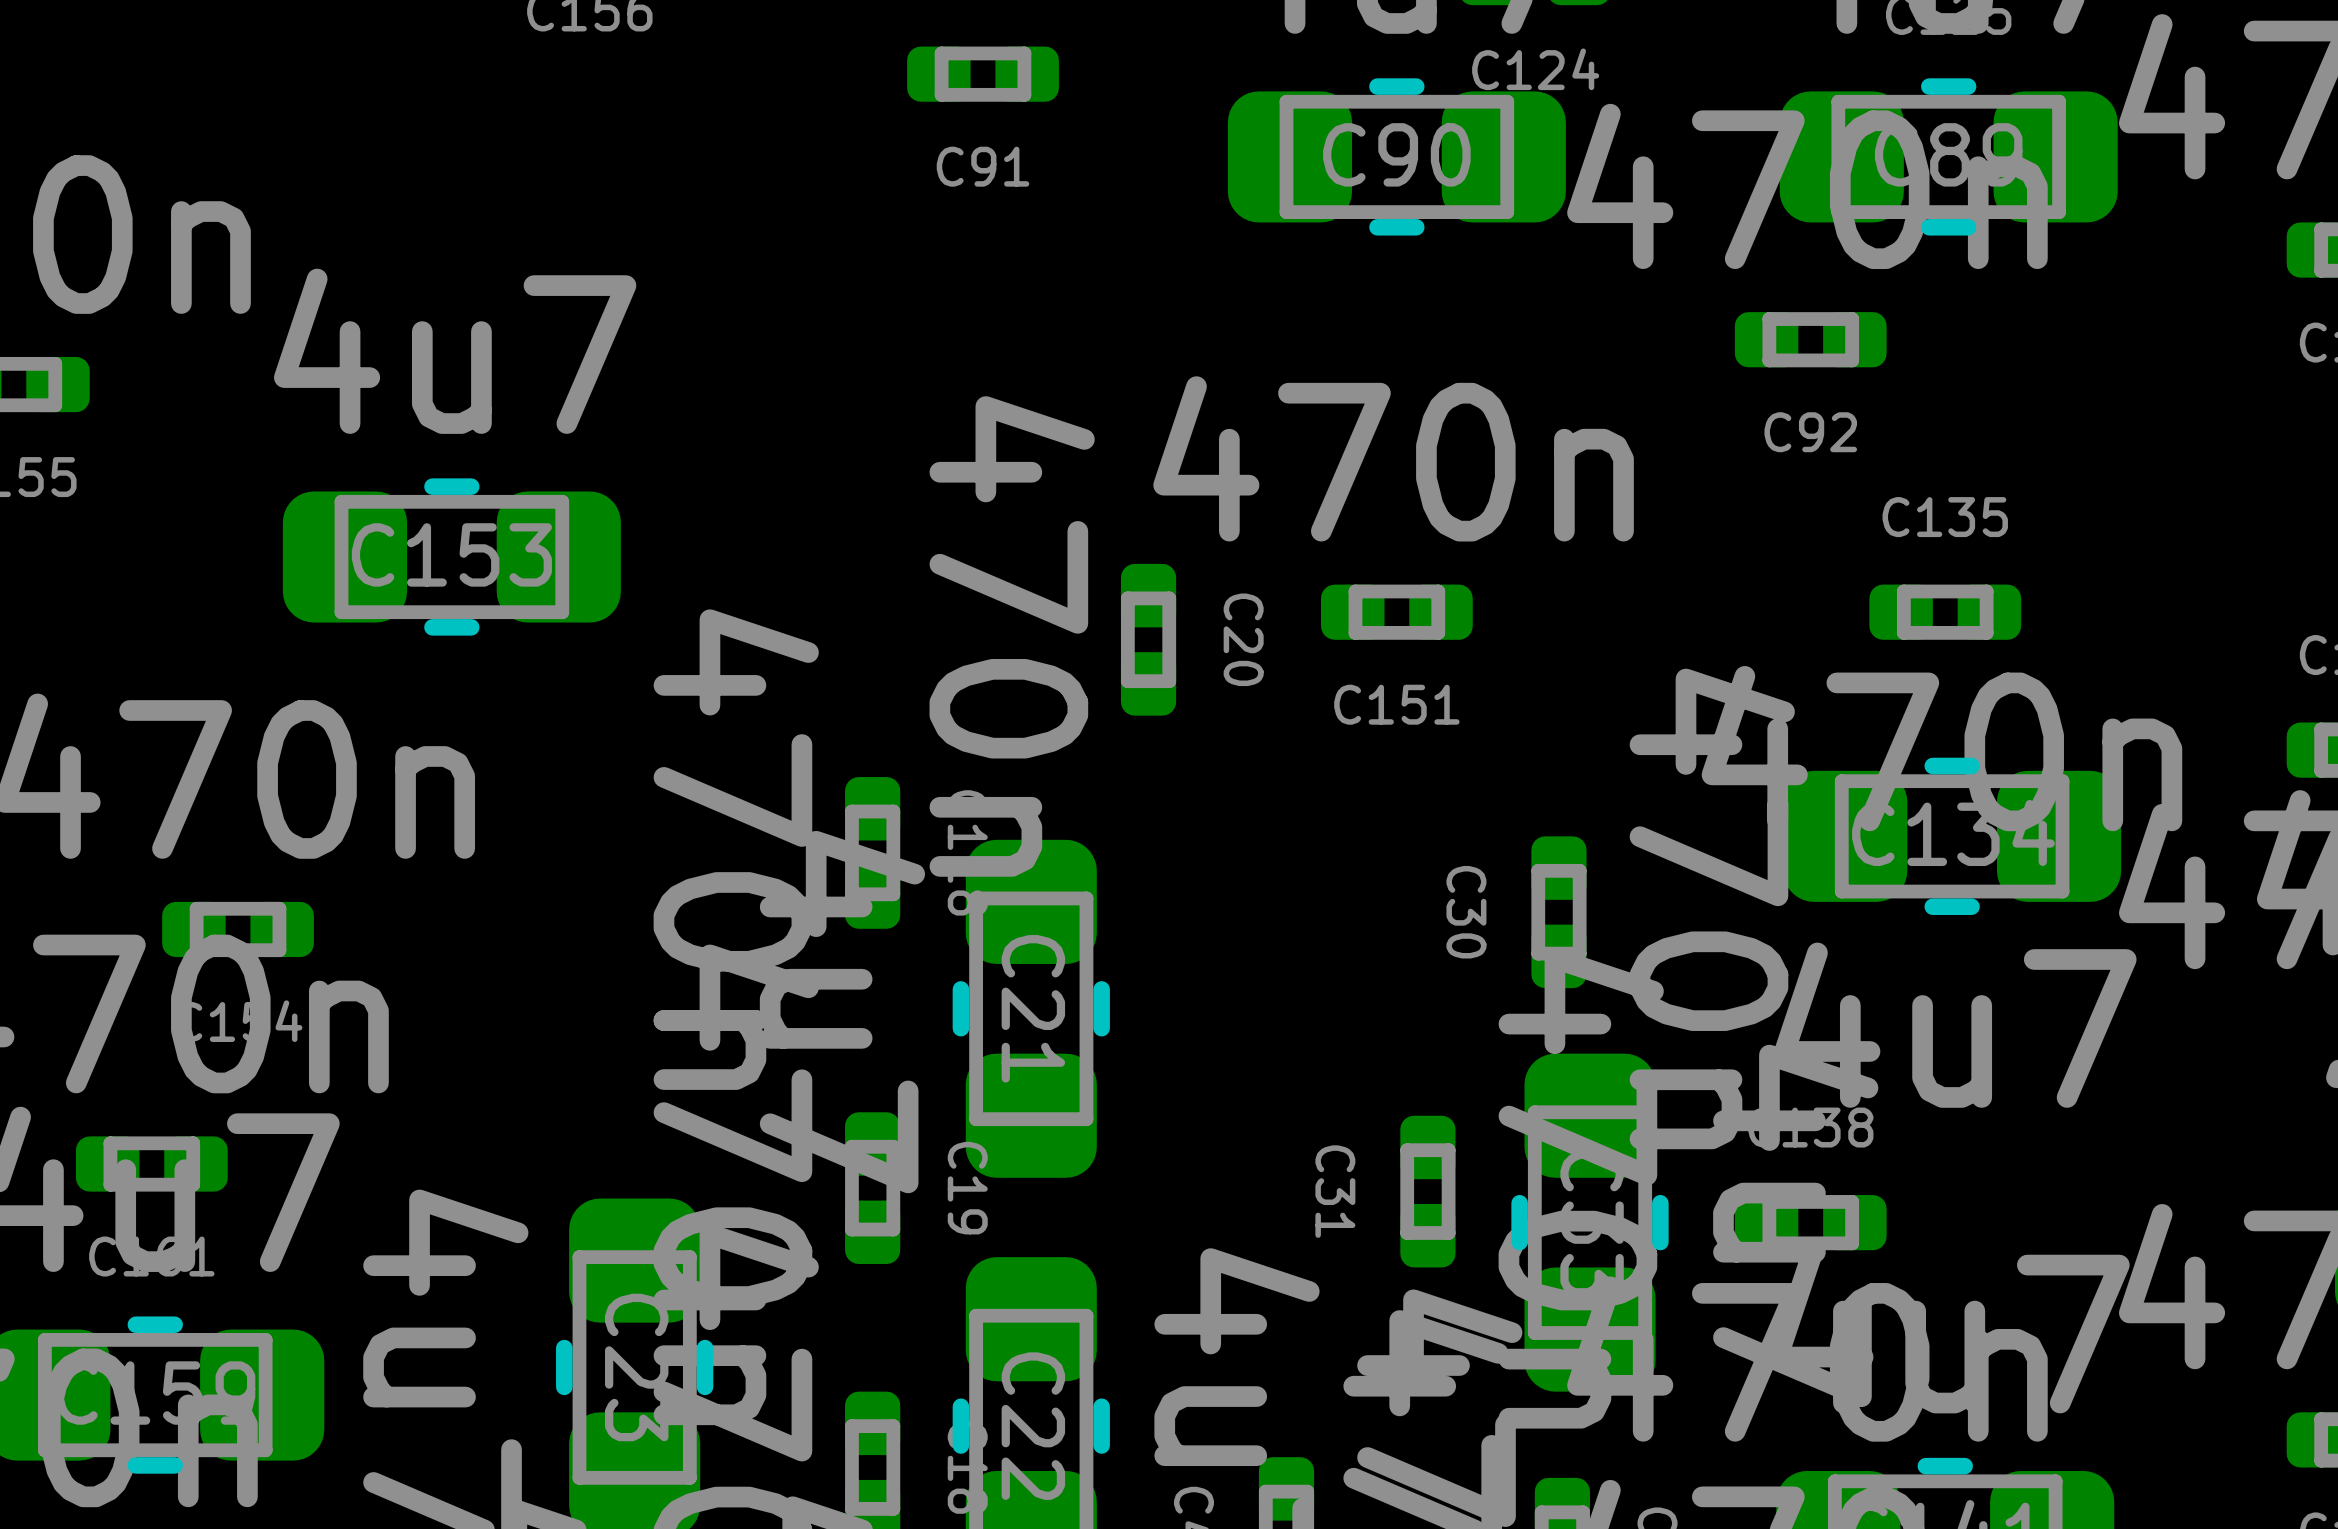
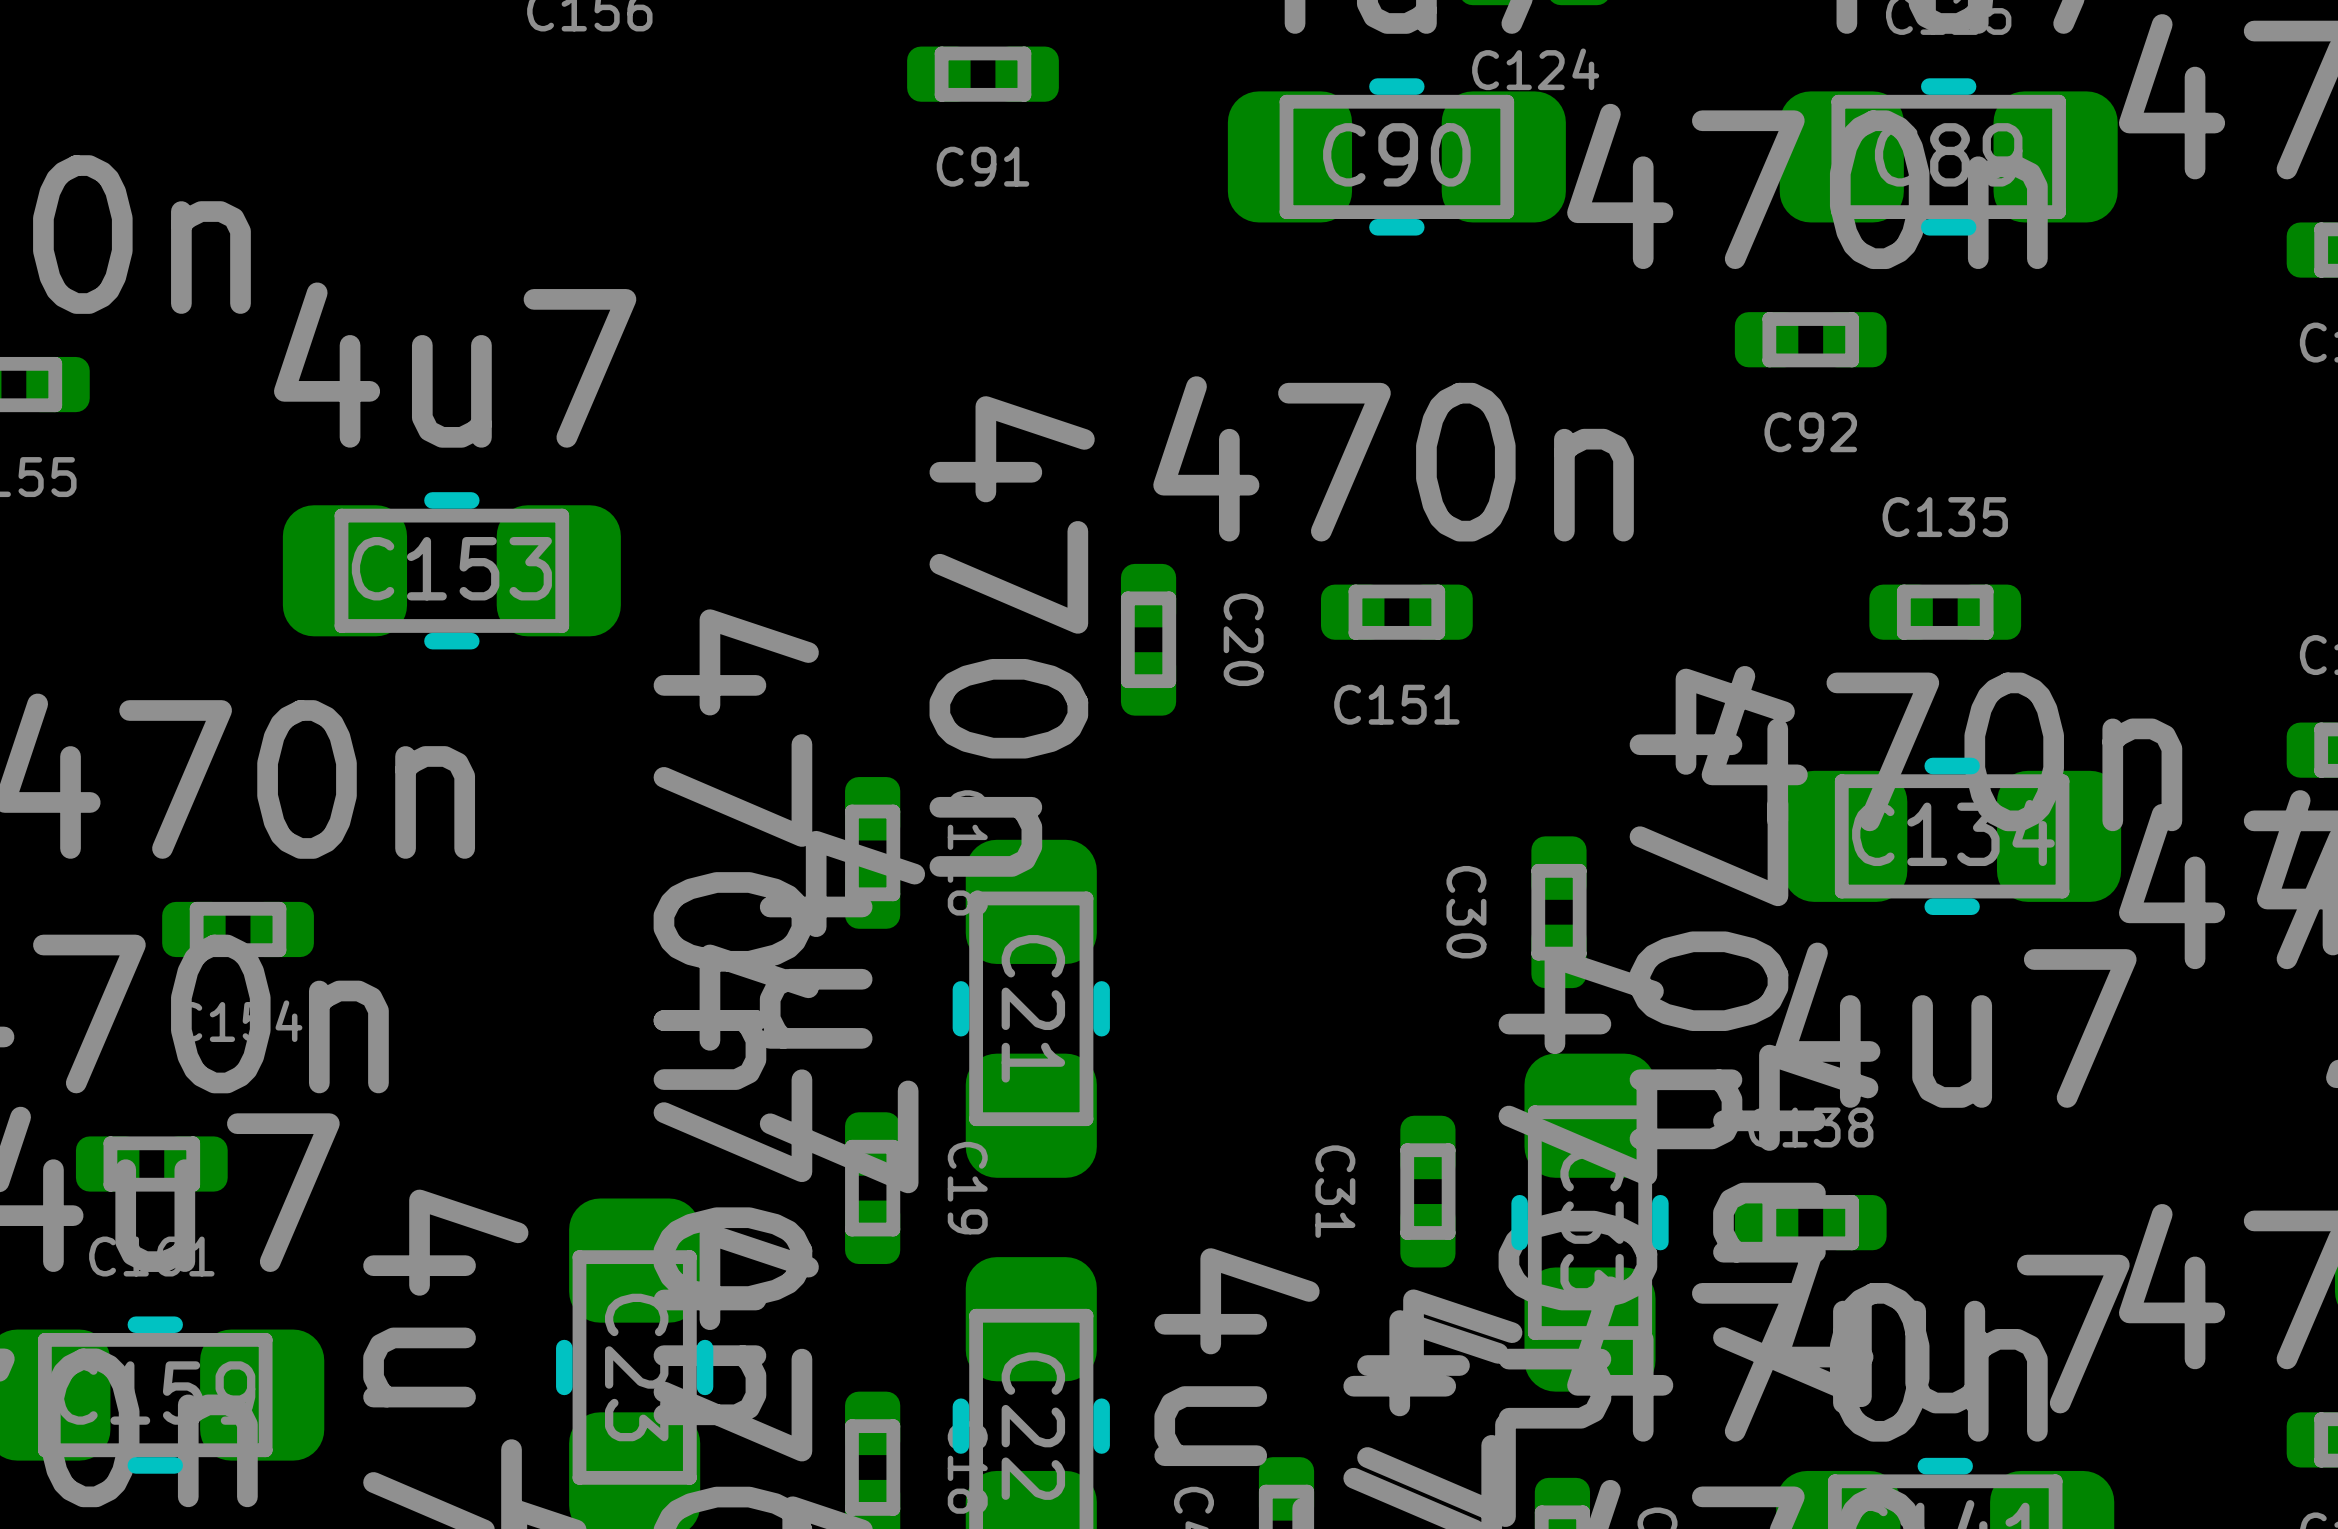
C153 position: (451, 557) -> (451, 570)

